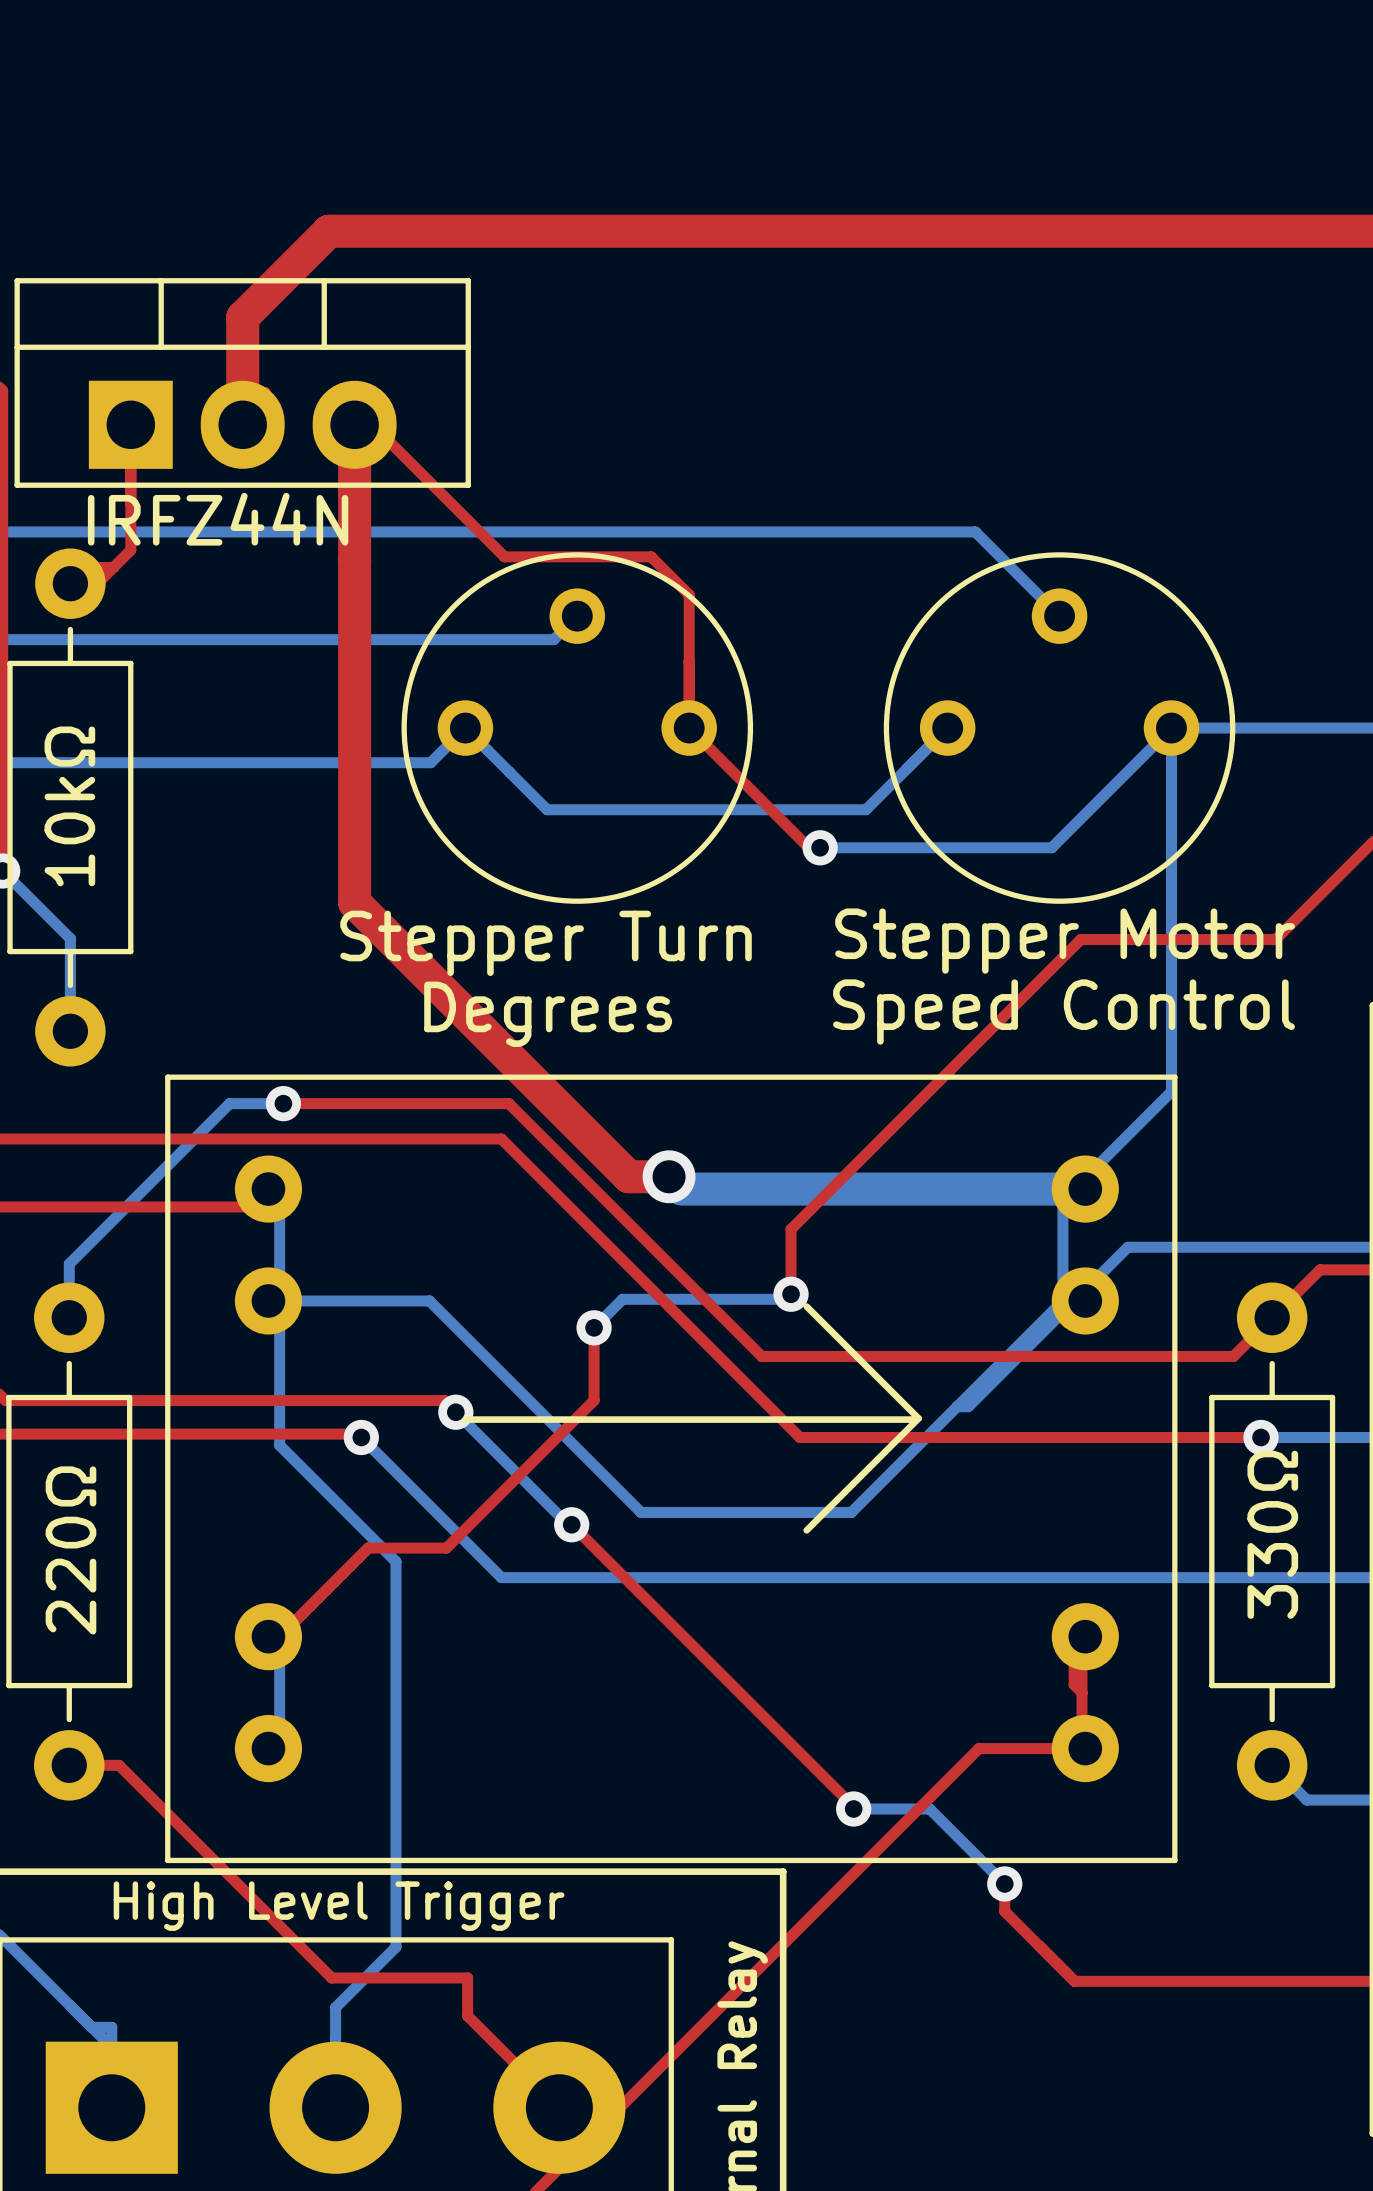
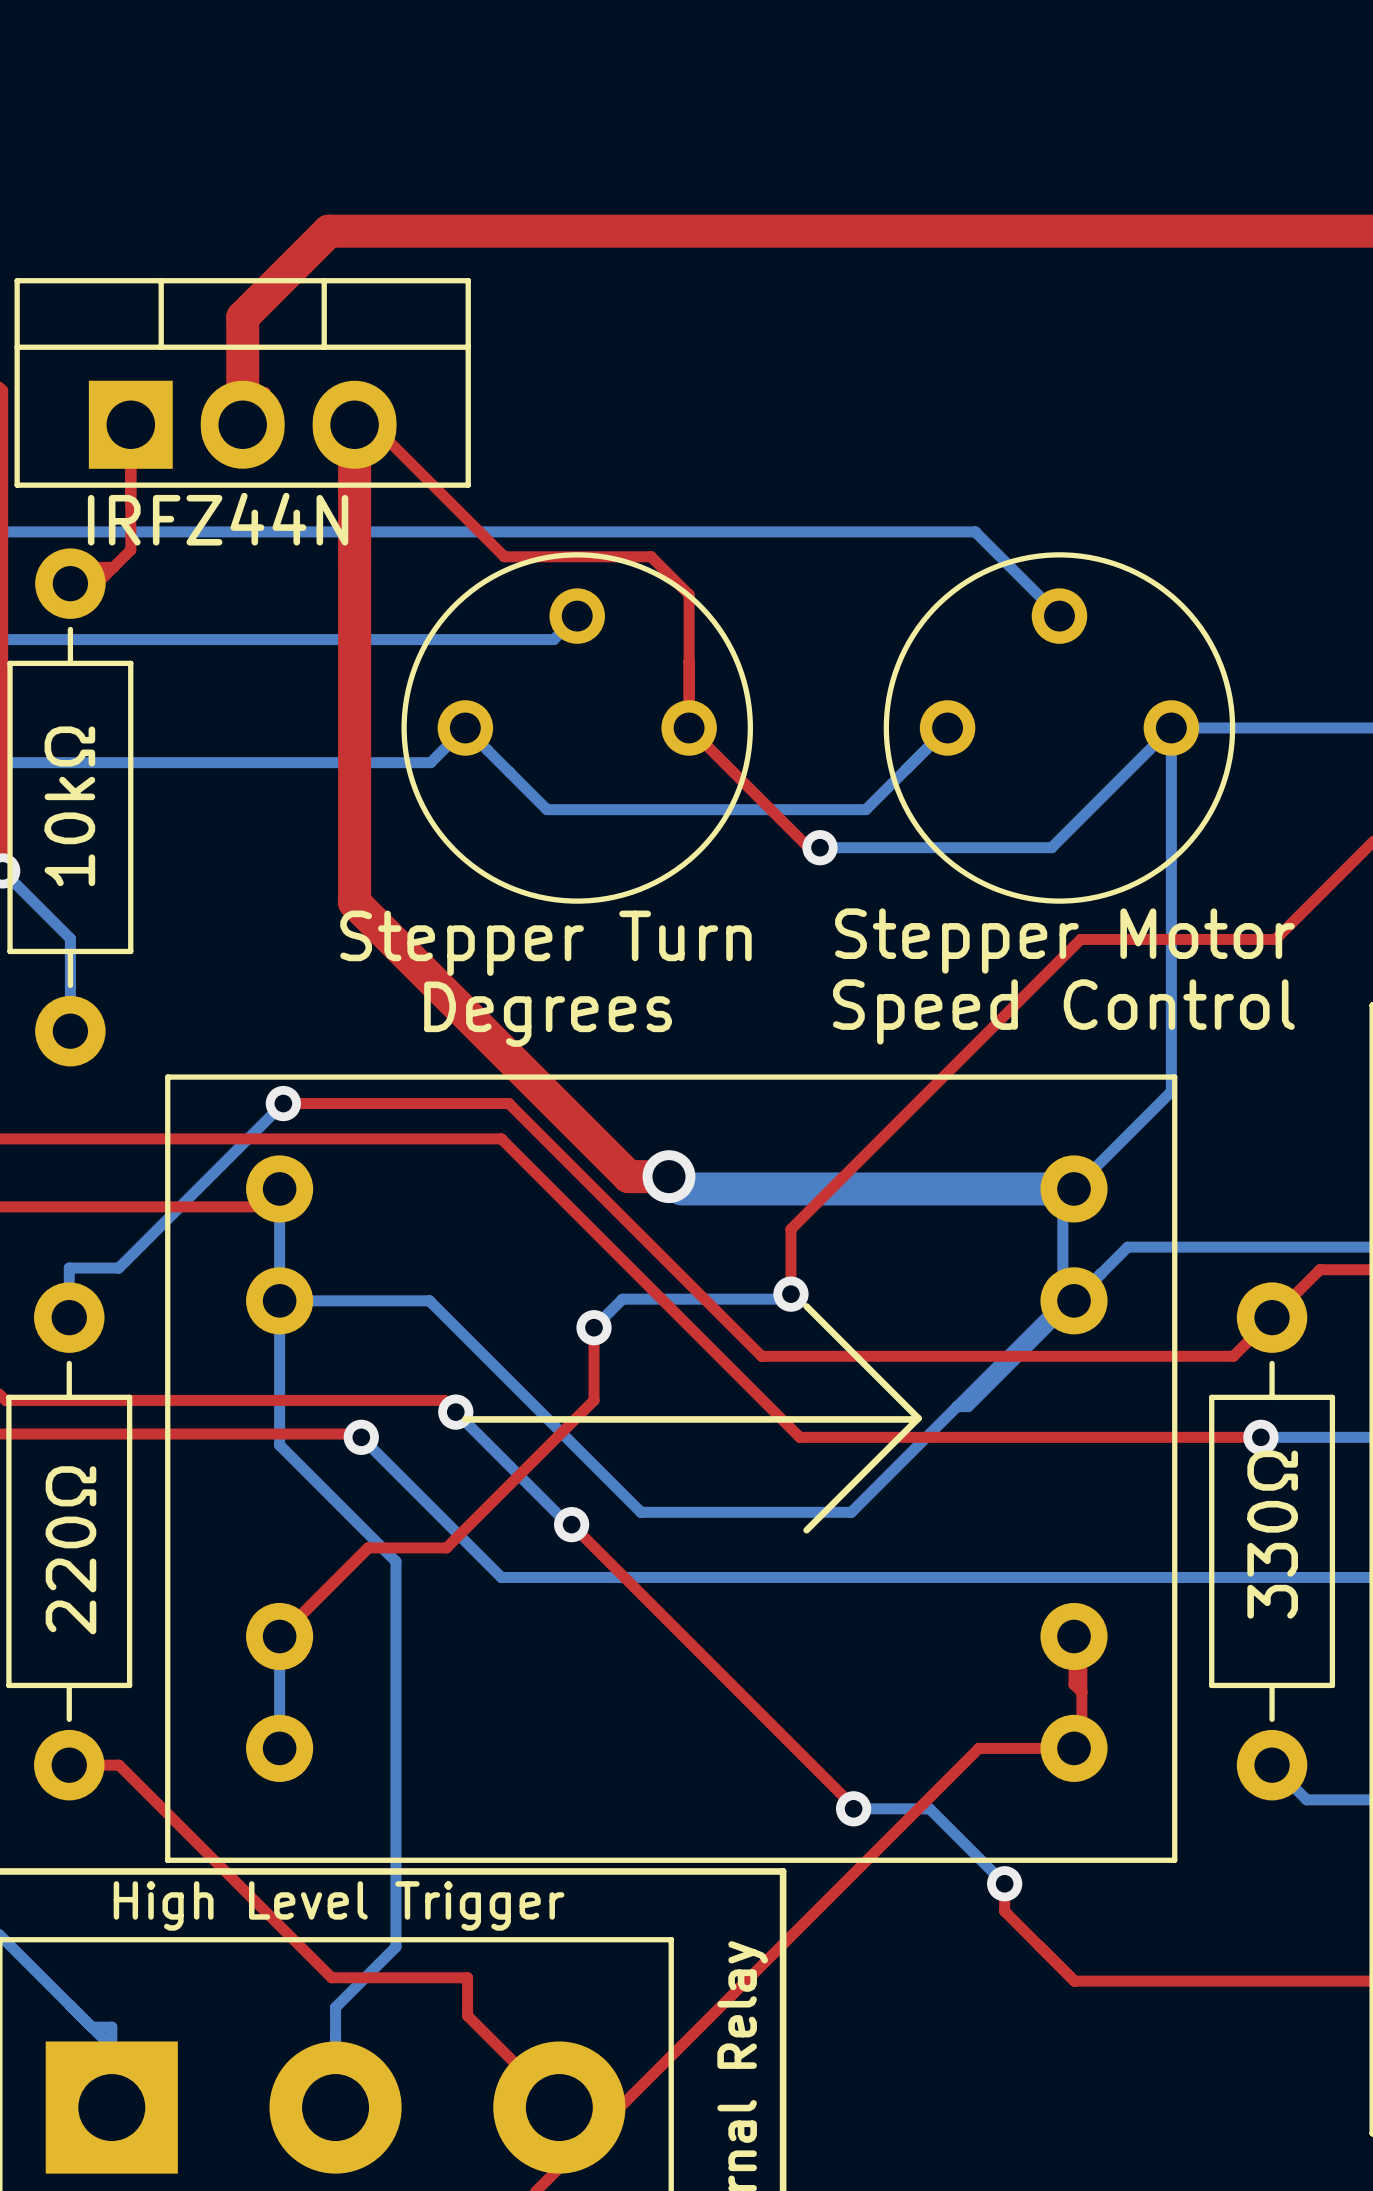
part footprint: [165, 1074, 1178, 1864] -> [165, 1074, 1178, 1863]
bottom track: (283, 1103) (229, 1103) (69, 1264) (69, 1268) -> (283, 1103) (118, 1268) (69, 1268)

